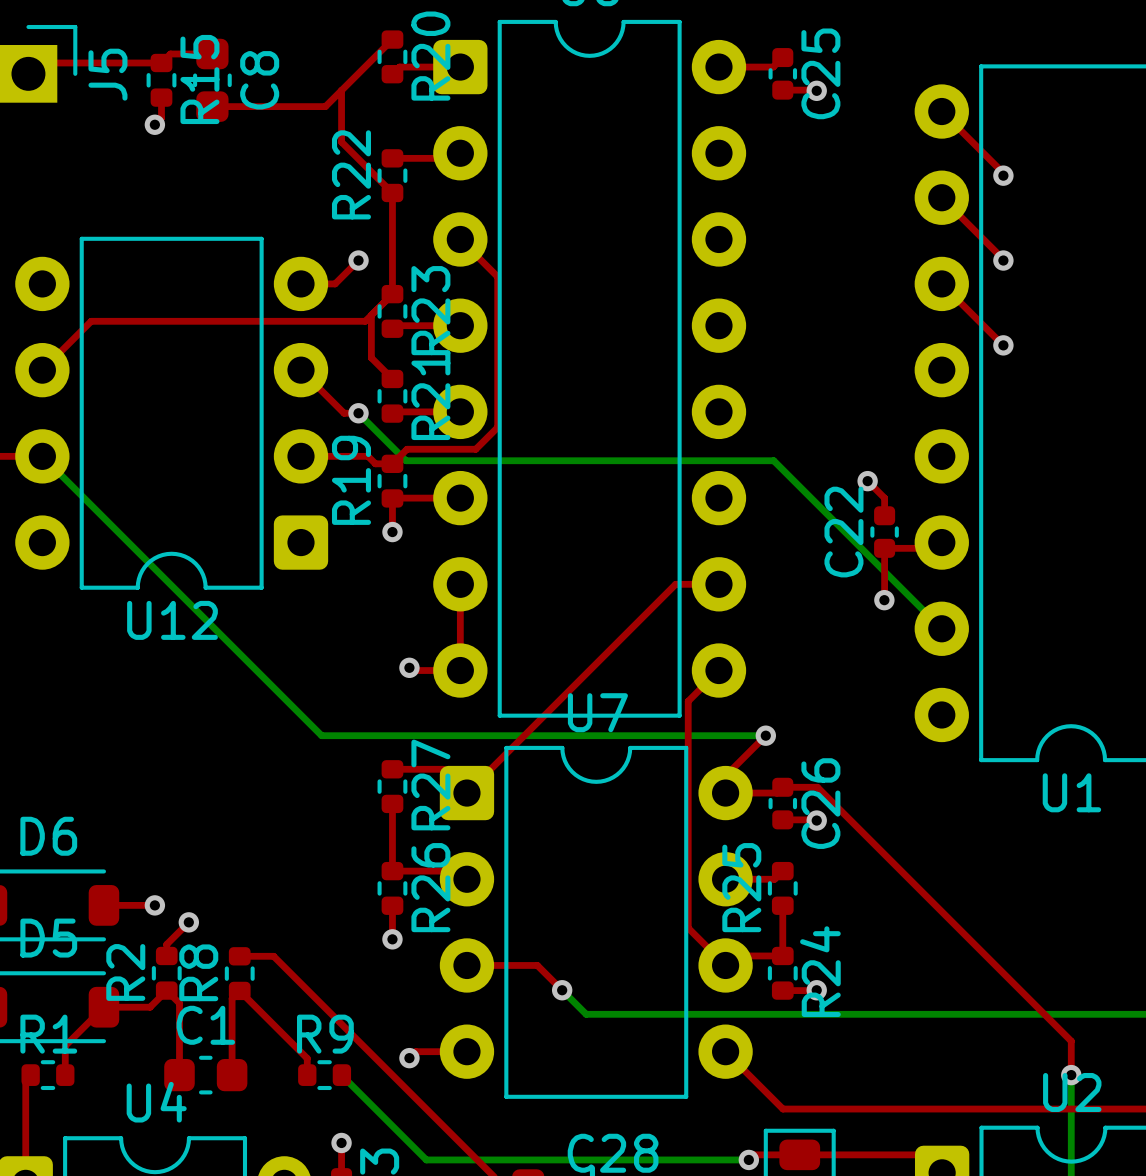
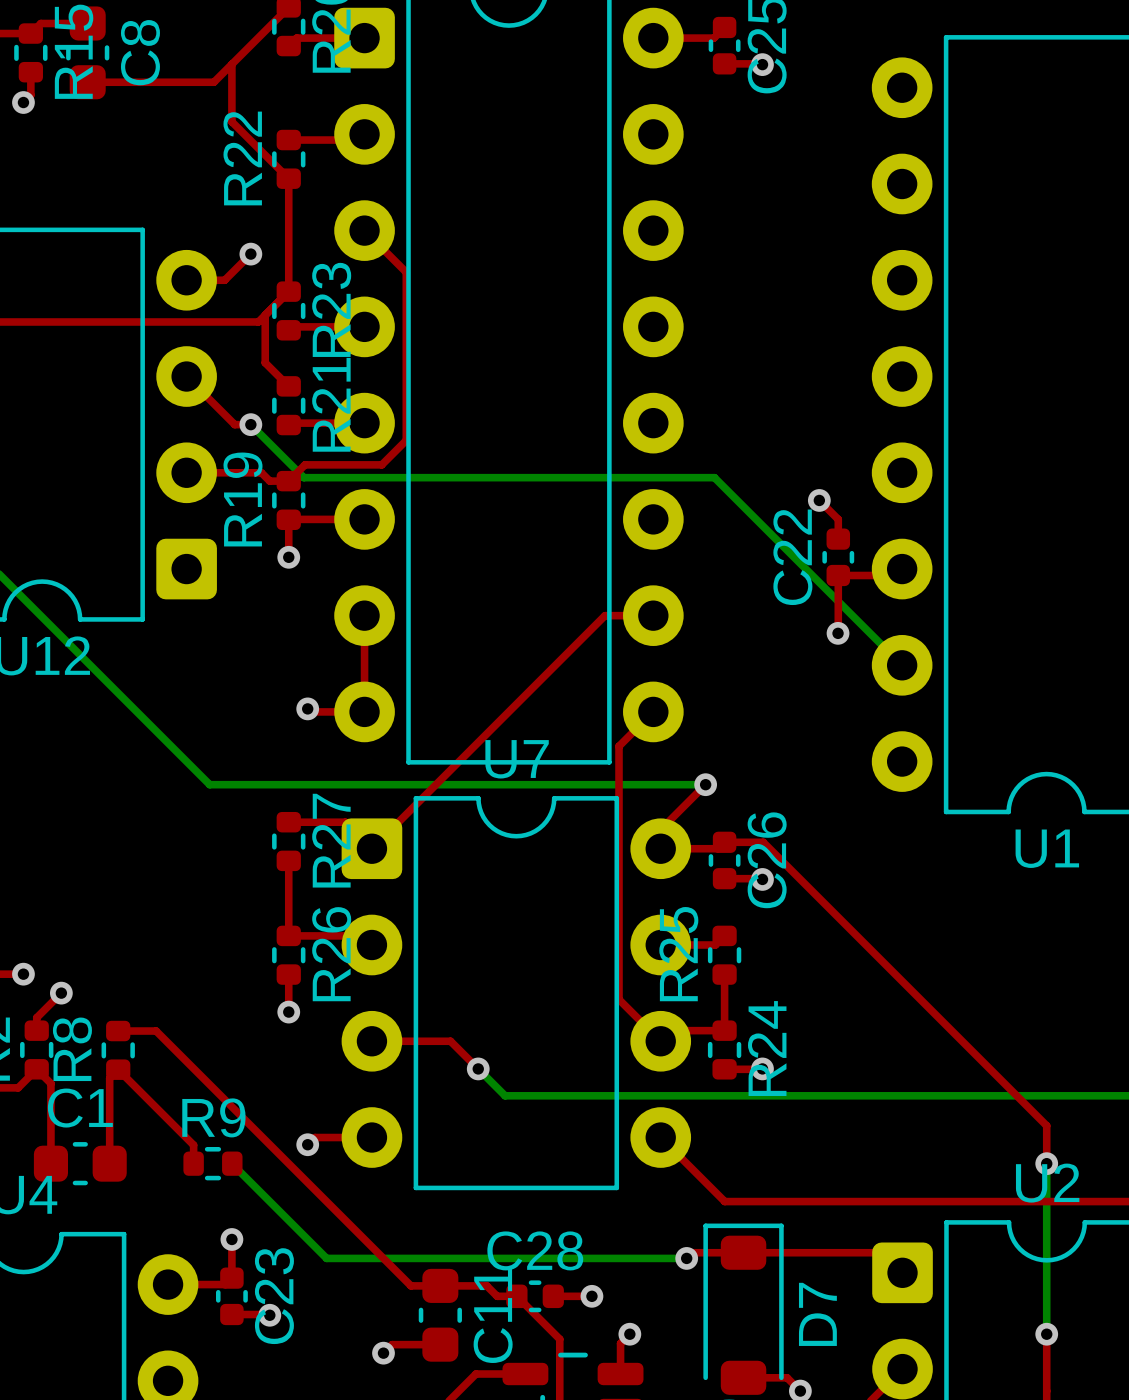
top track: (941, 111) (1003, 173) (1003, 175) -> none
via: (1003, 175) -> none
top track: (941, 197) (1003, 260) -> none
via: (1003, 260) -> none
top track: (941, 283) (1003, 345) -> none
via: (1003, 345) -> none

